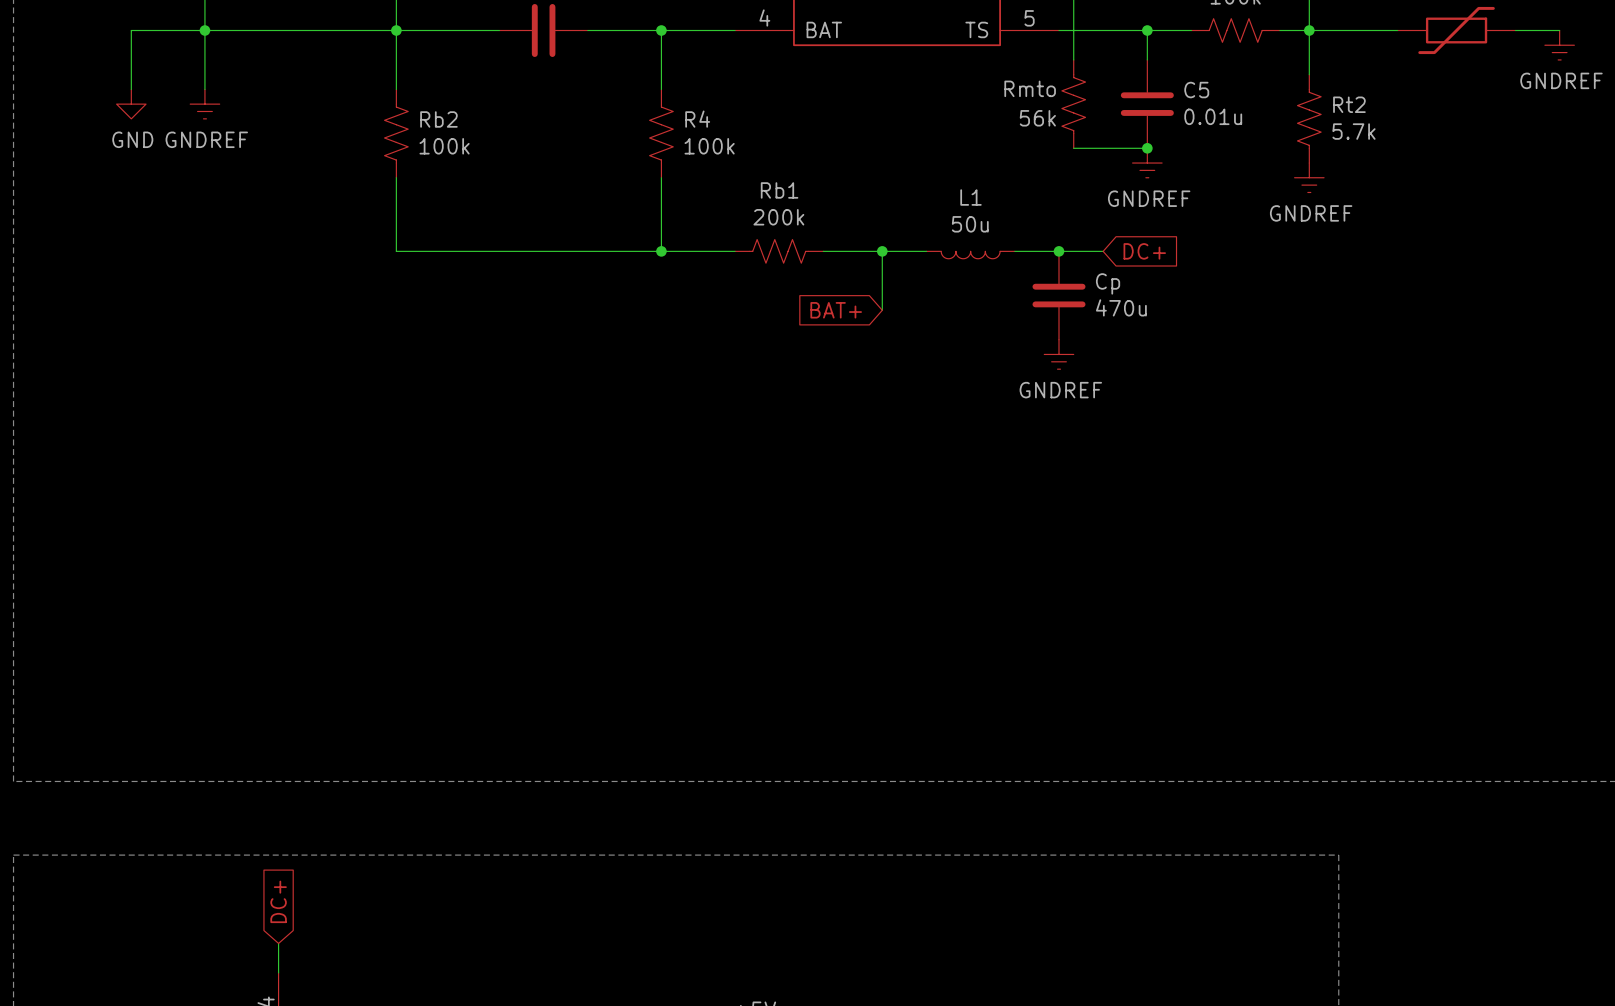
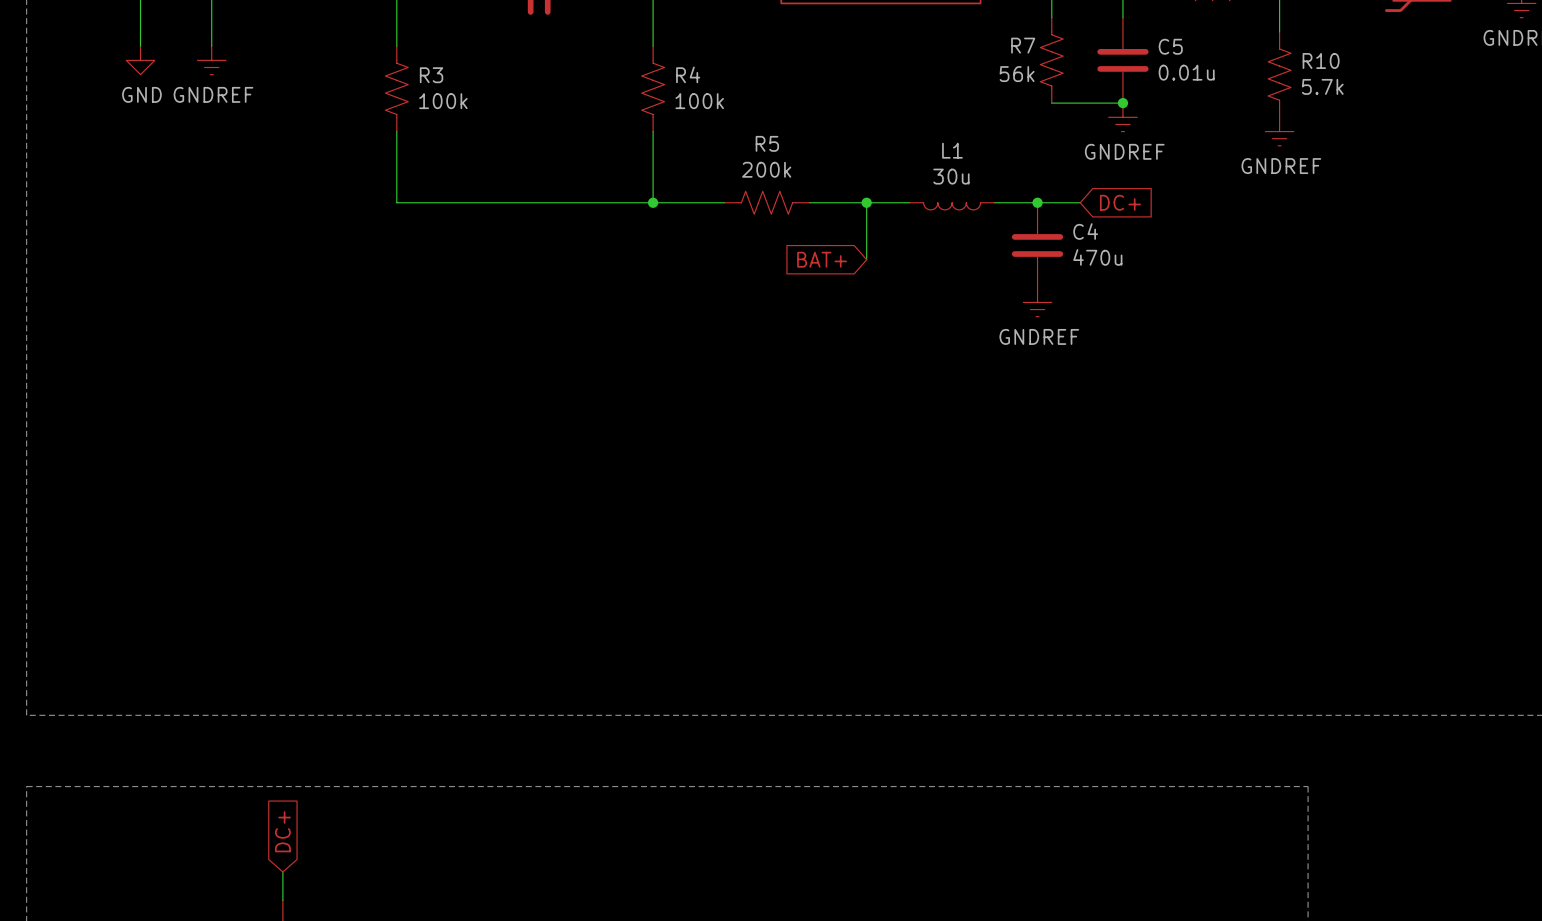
Rmto name: Rmto (1030, 88) -> R7 (1023, 45)
Rt2 name: Rt2 (1349, 104) -> R10 (1321, 60)
Rb2 name: Rb2 (438, 119) -> R3 (431, 75)
Rb1 name: Rb1 (779, 190) -> R5 (767, 143)
L1 value: 50u (970, 224) -> 30u (951, 176)
Cp name: Cp (1108, 283) -> C4 (1085, 231)

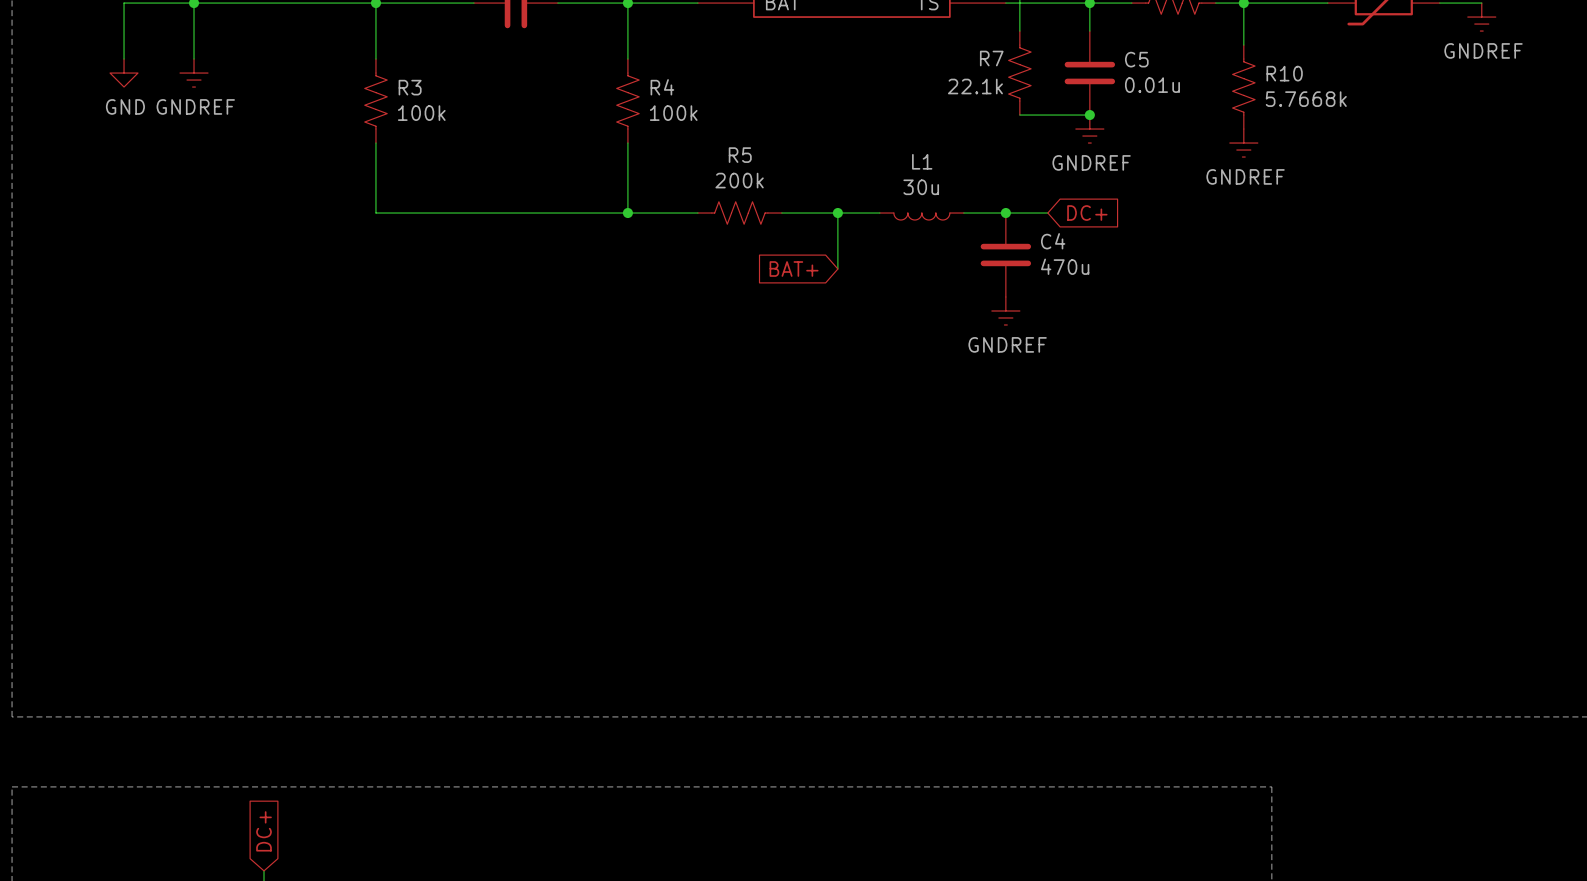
R7 value: 56k (1017, 74) -> 22.1k (975, 86)
R10 value: 5.7k (1322, 86) -> 5.7668k (1306, 99)

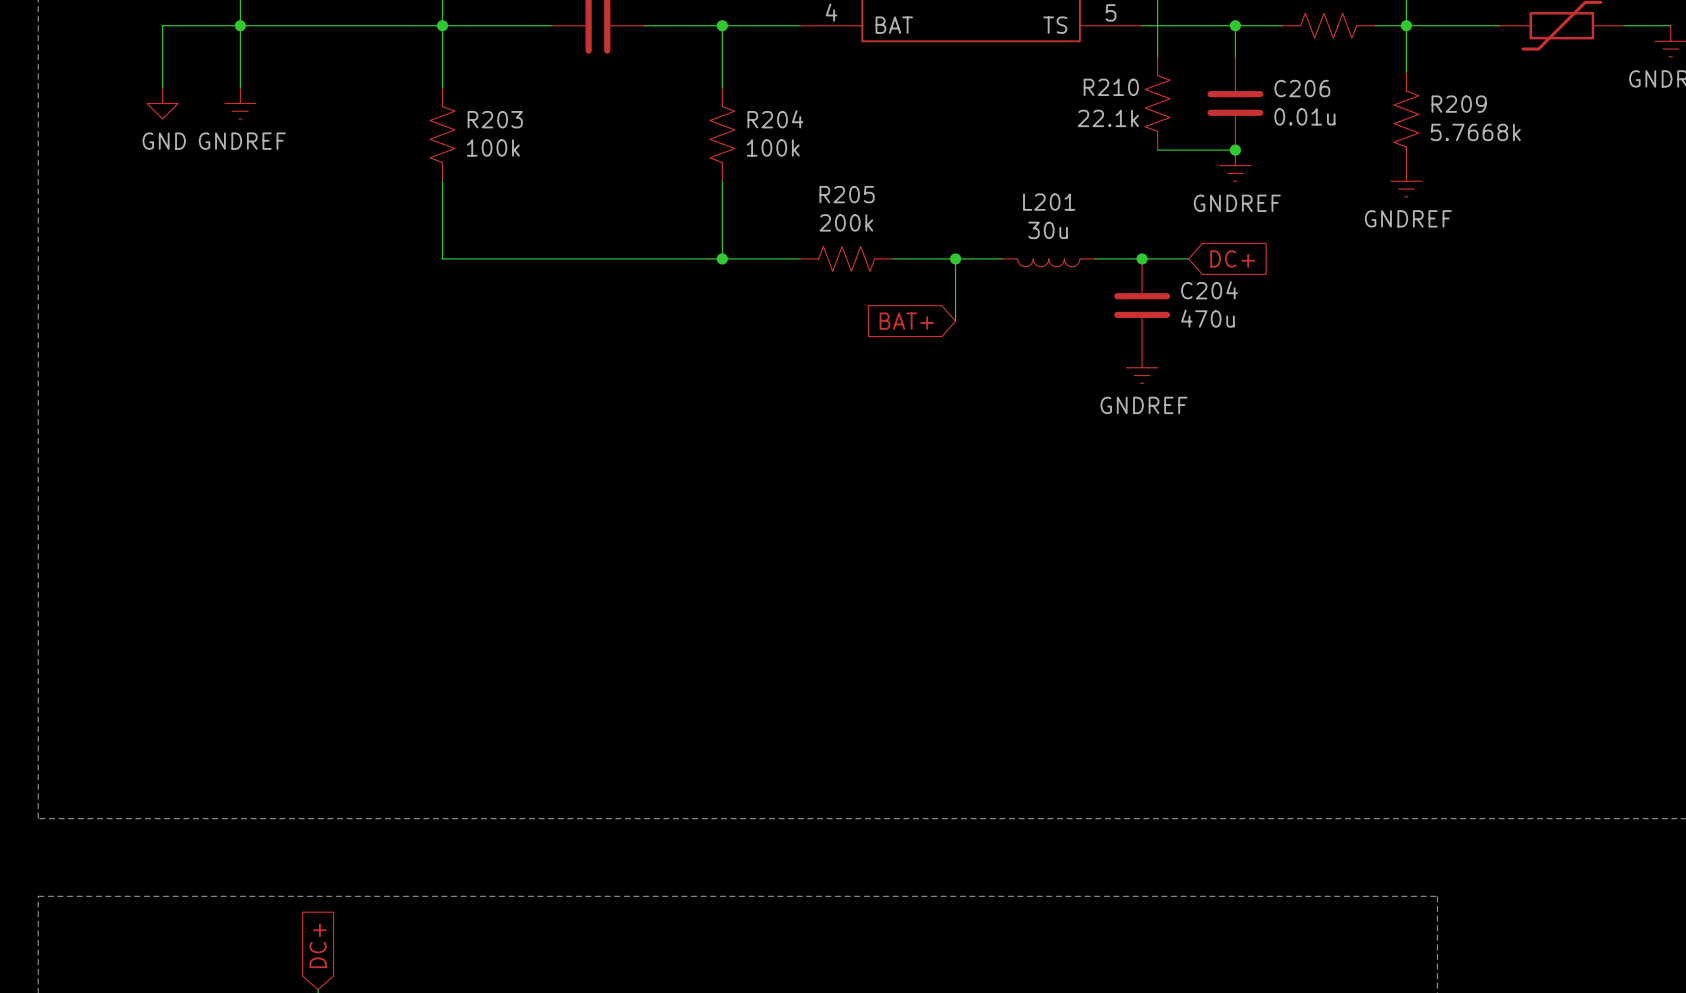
R7 name: R7 (991, 58) -> R210 (1111, 87)
C5 name: C5 (1136, 59) -> C206 (1302, 88)
R10 name: R10 (1284, 73) -> R209 (1459, 104)
R3 name: R3 (410, 87) -> R203 (495, 119)
R4 name: R4 (662, 87) -> R204 (775, 119)
R5 name: R5 (740, 155) -> R205 (847, 194)
L1 name: L1 (922, 161) -> L201 (1049, 202)
C4 name: C4 (1053, 241) -> C204 (1209, 290)

